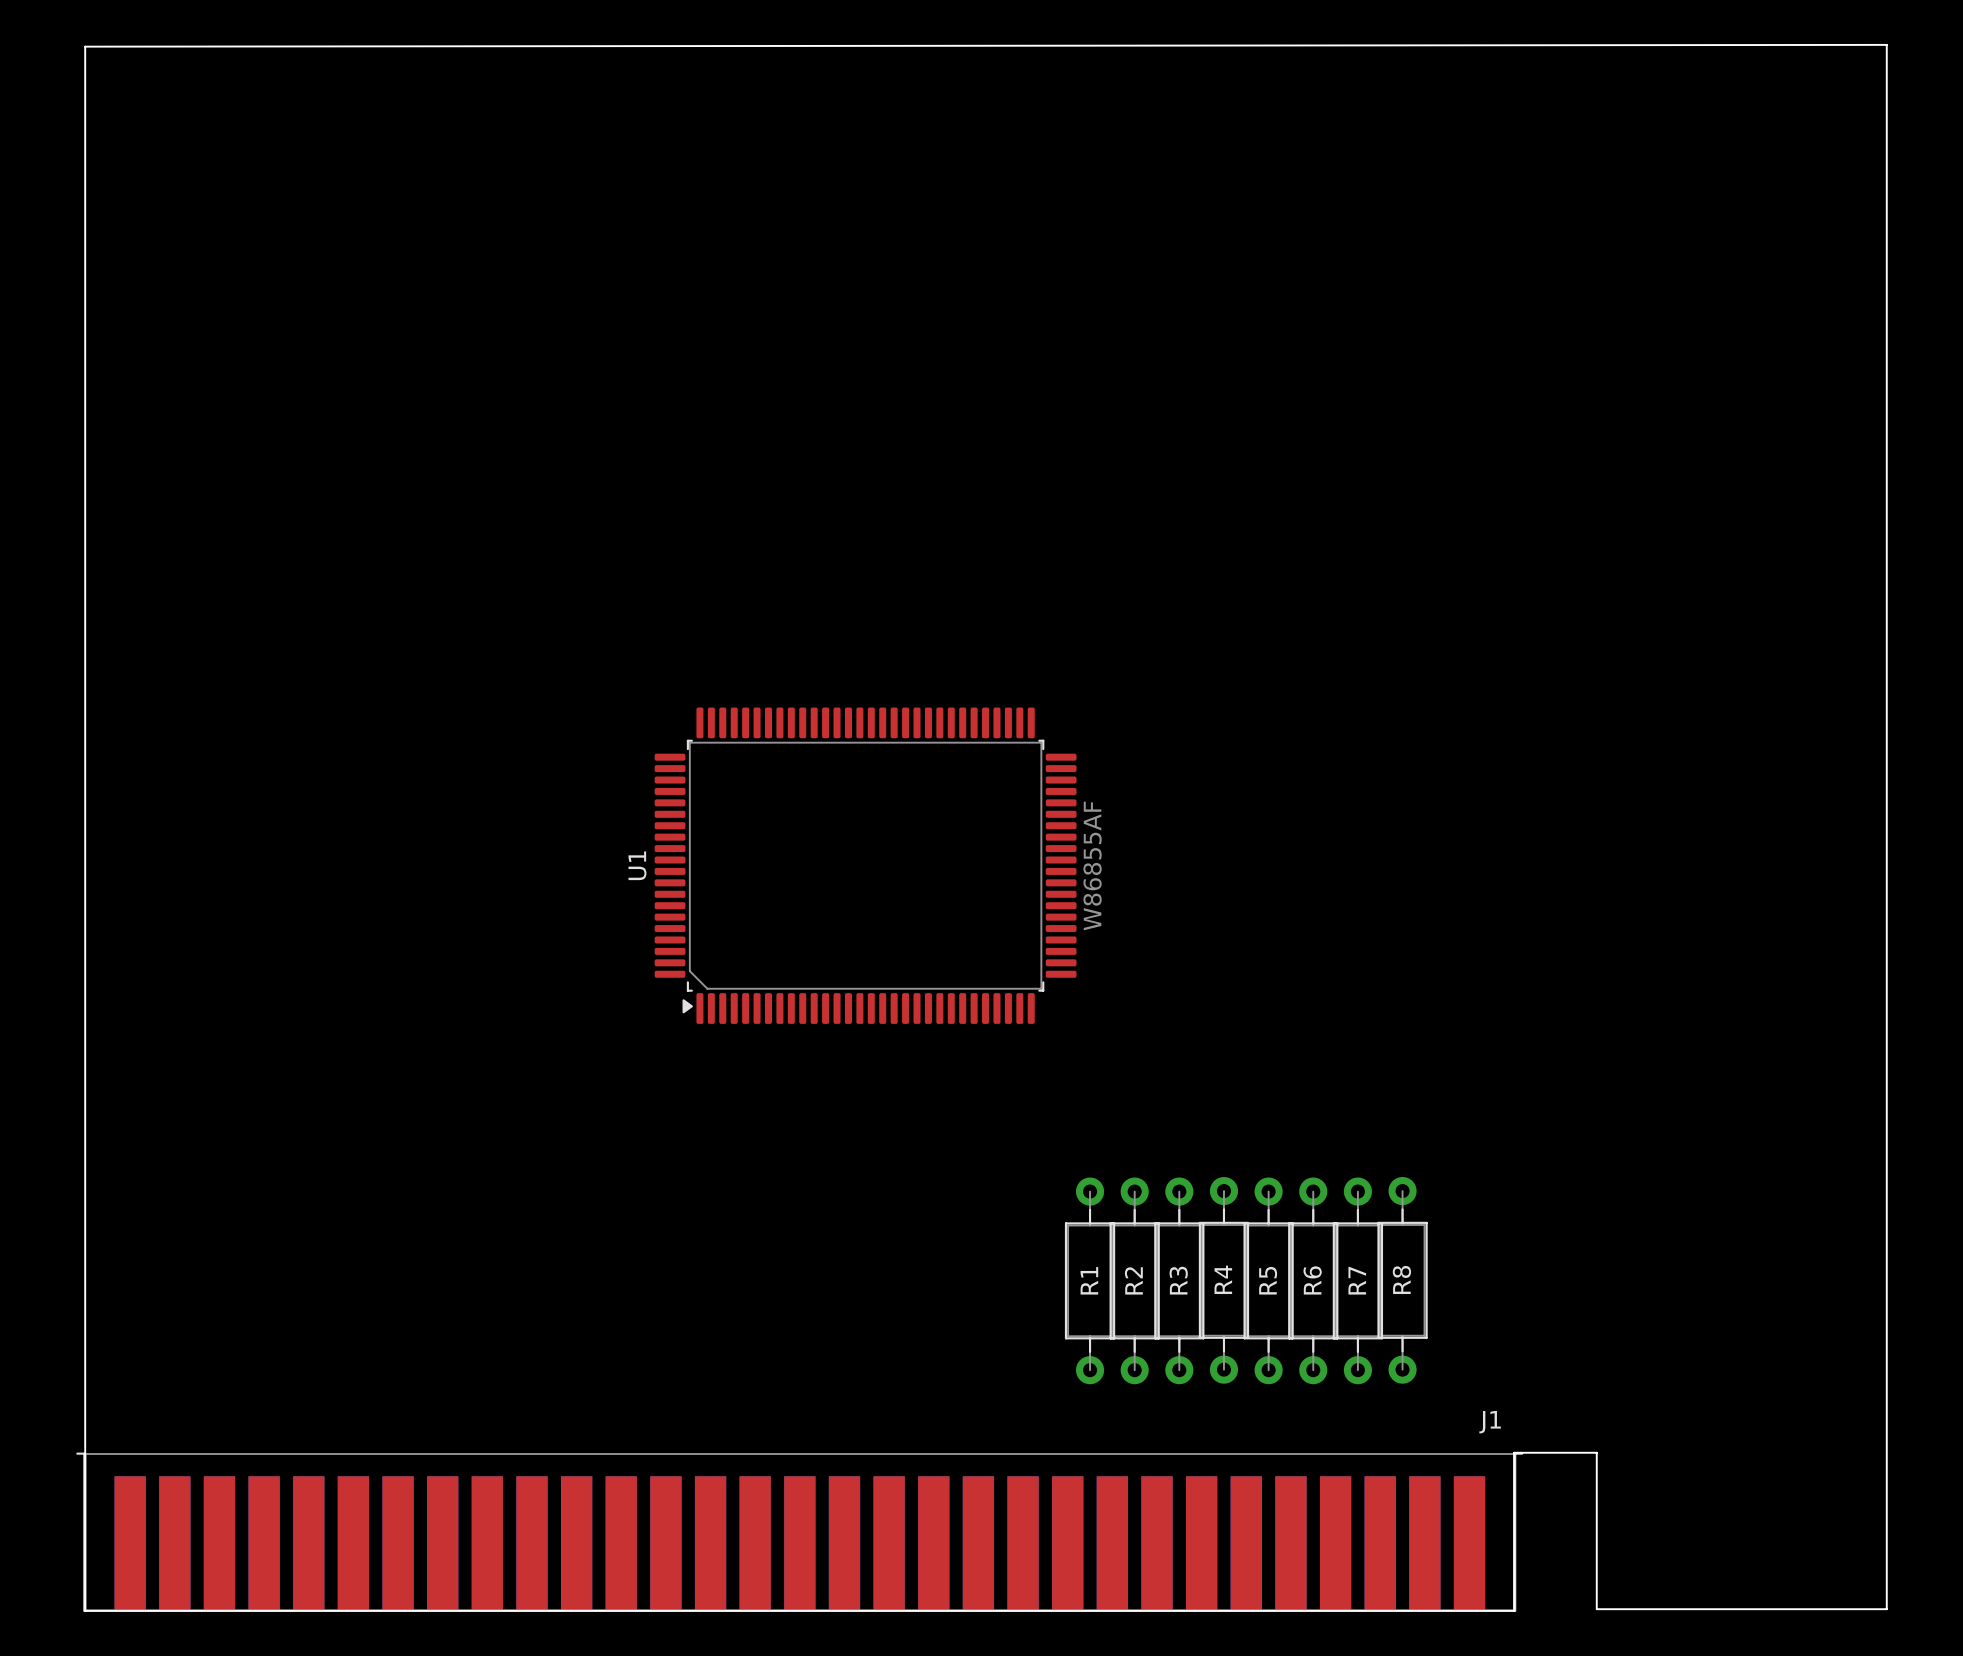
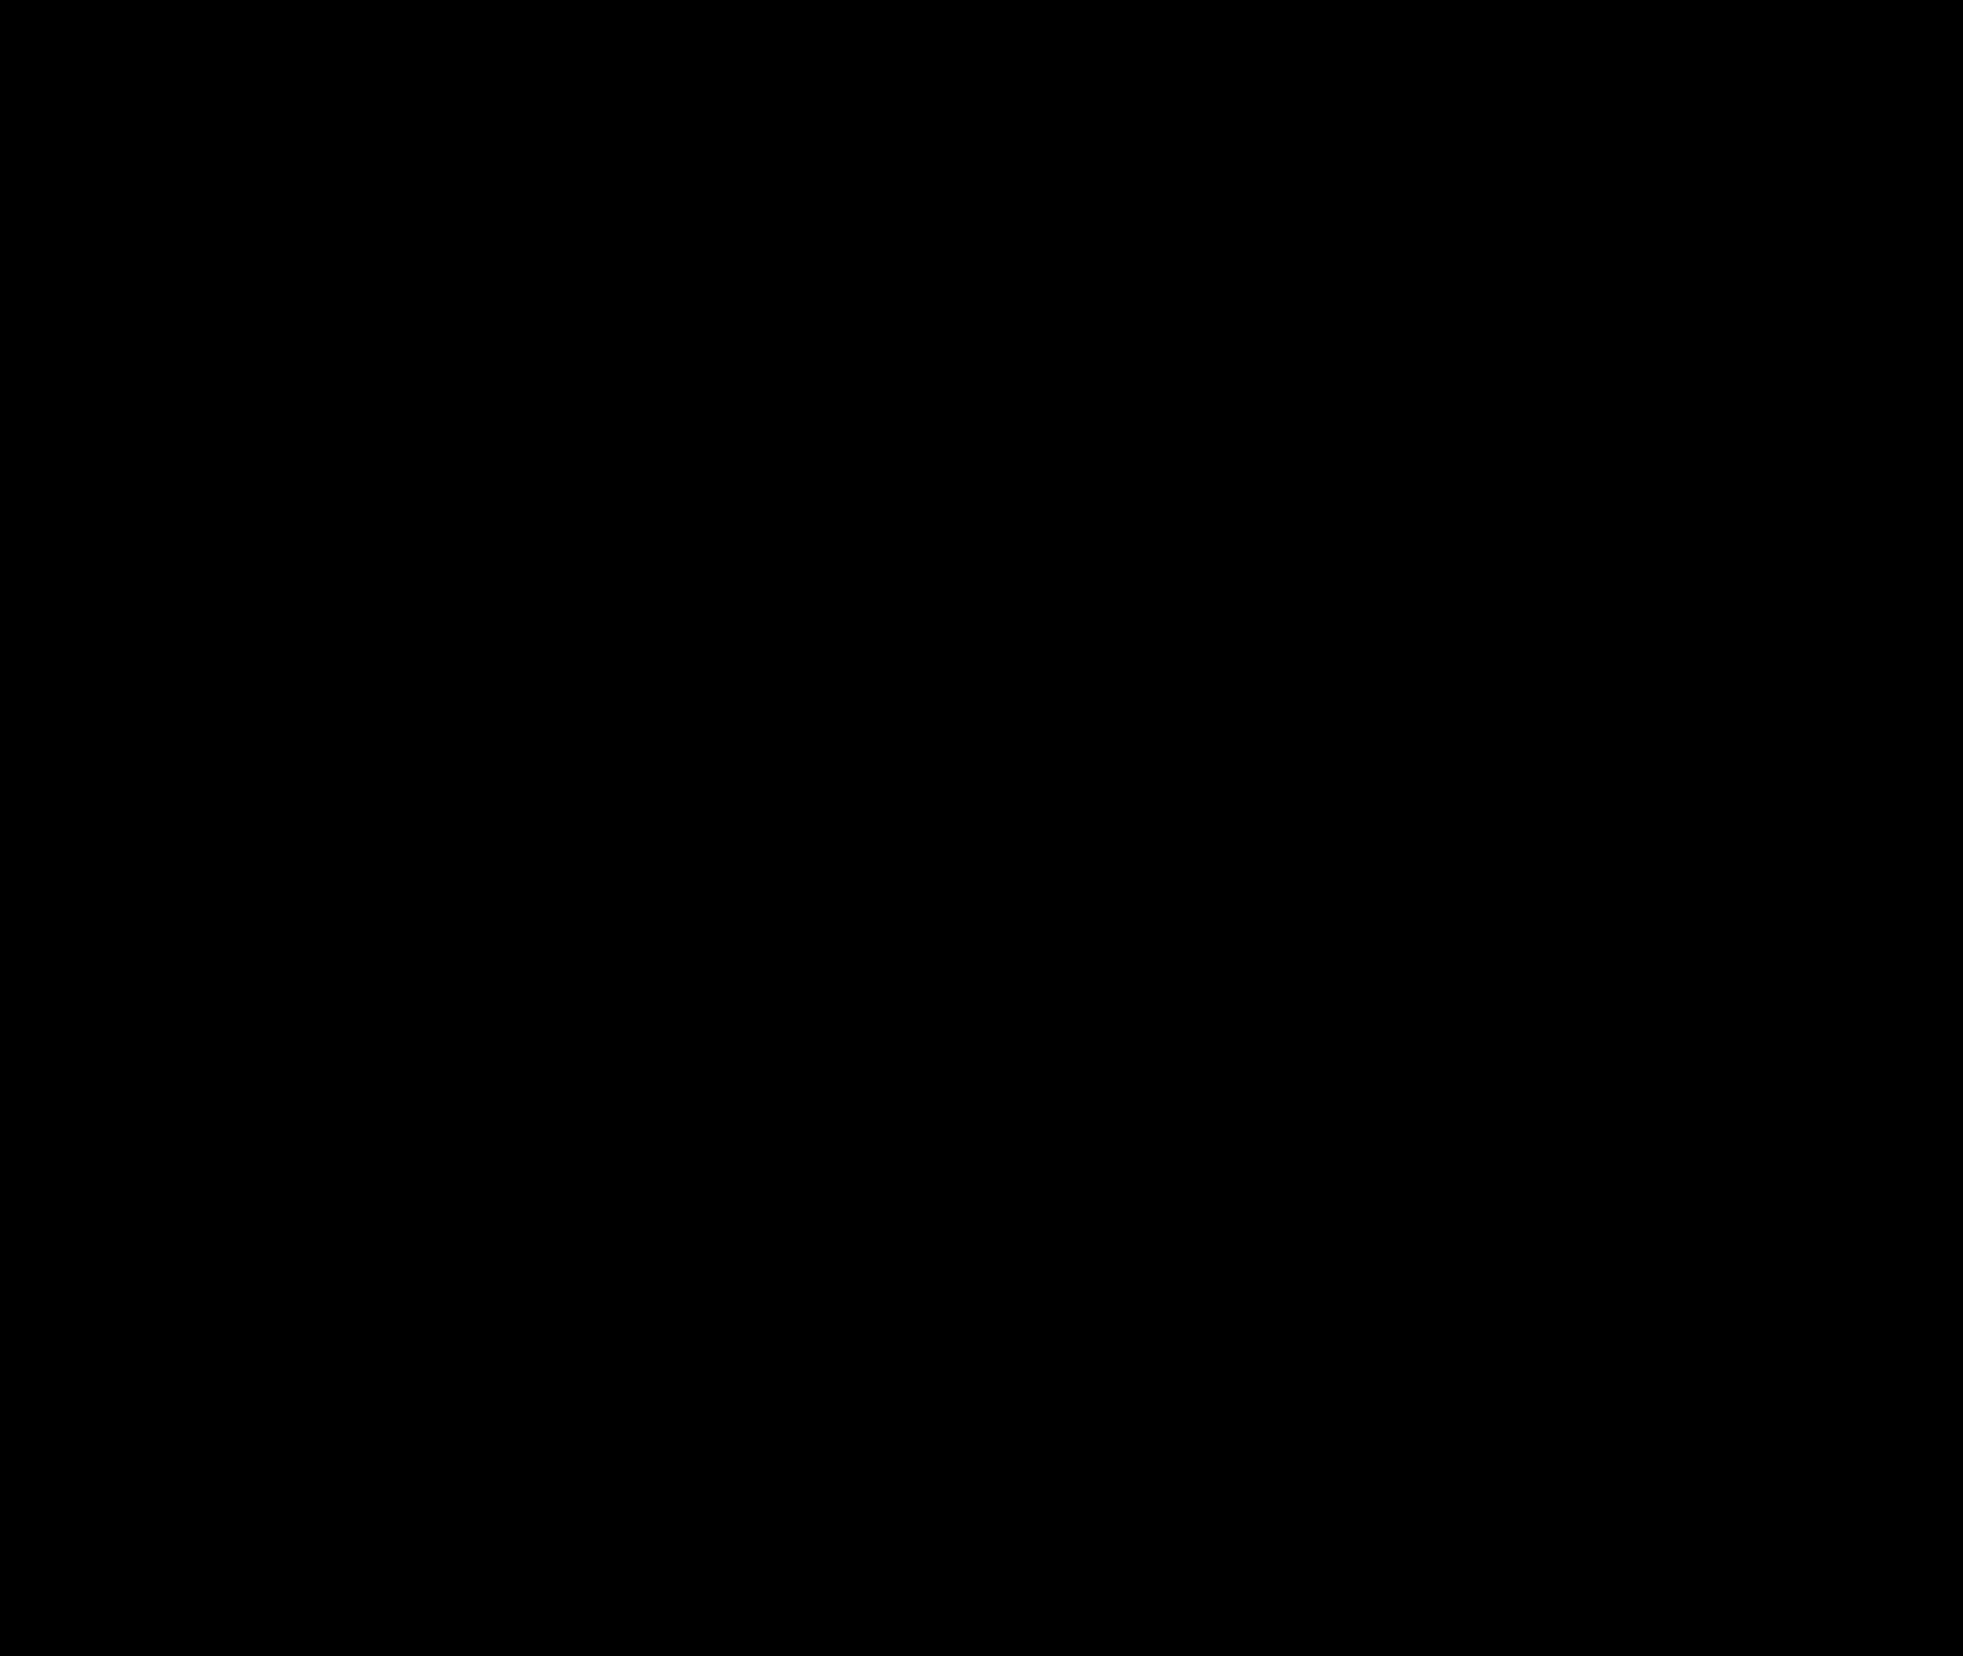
board edge: (1886, 44) (85, 46) (85, 1610) (1514, 1610) (1514, 1452) (1596, 1452) (1596, 1609) (1886, 1609) (1886, 44) -> none
U1: W86855AF (865, 865) -> none
R1: (1090, 1280) -> none
R2: (1134, 1280) -> none
R3: (1179, 1280) -> none
R4: (1223, 1280) -> none
R5: (1268, 1280) -> none
R6: (1313, 1280) -> none
R7: (1357, 1280) -> none
R8: (1402, 1280) -> none
J1: (799, 1532) -> none

